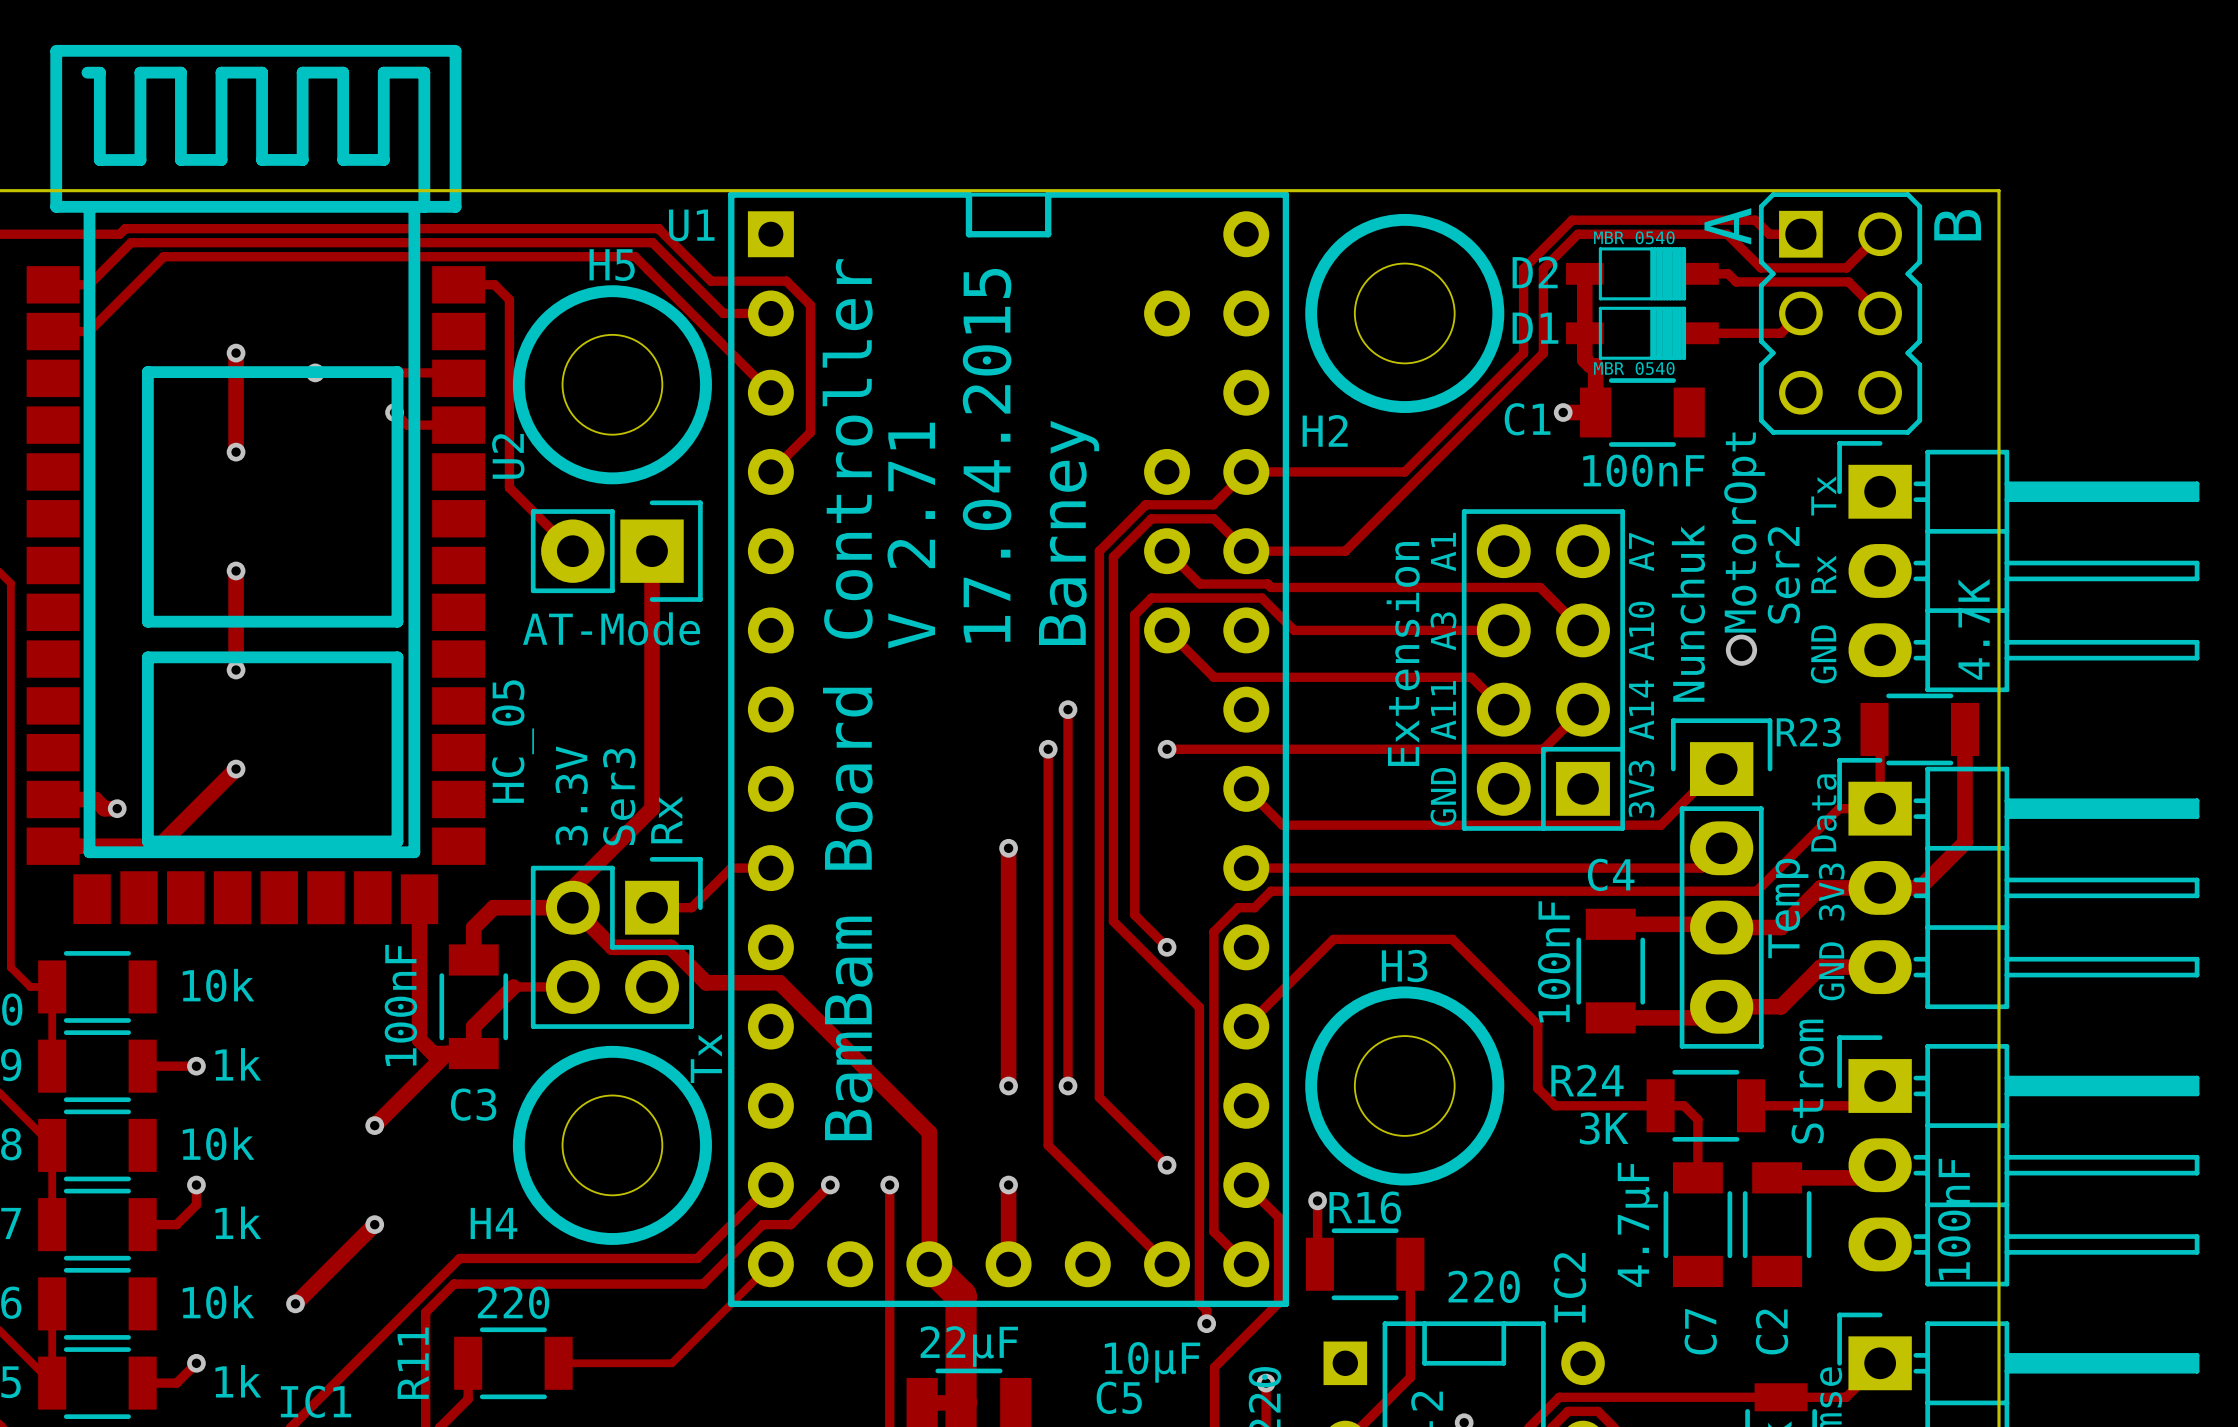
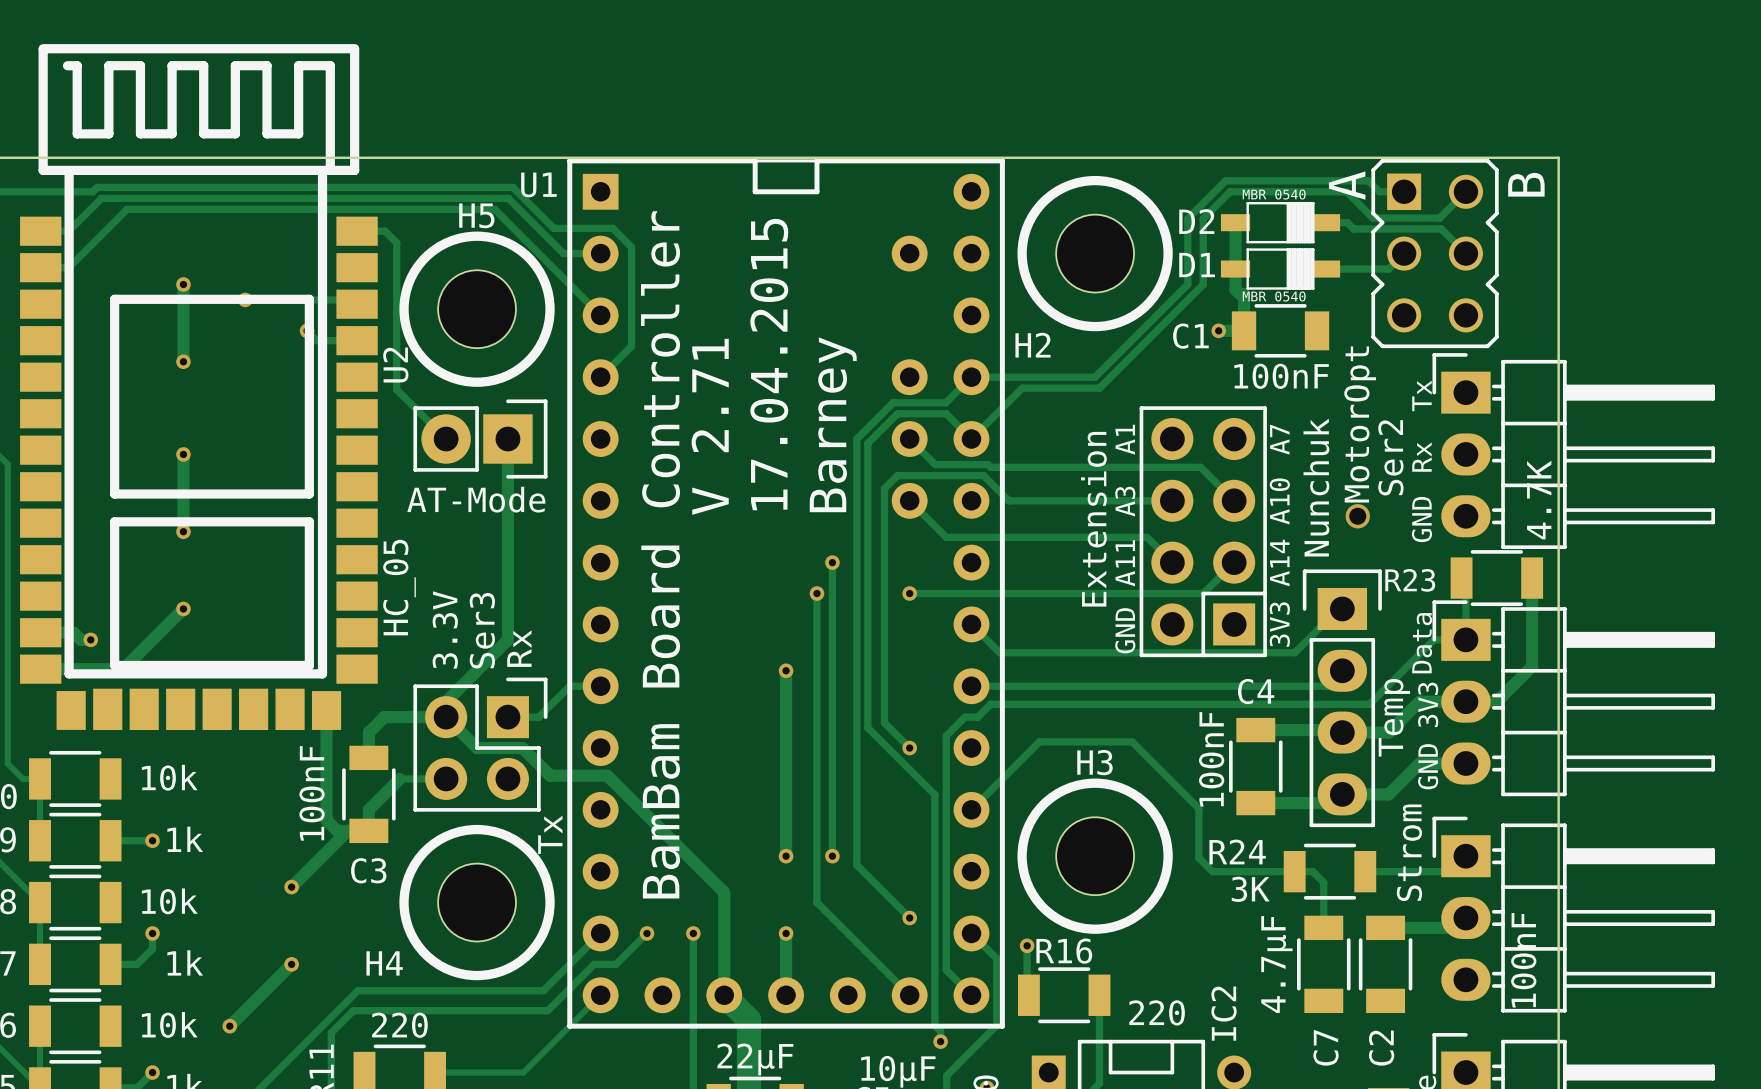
track: (1410, 485) (1345, 551) (1246, 551) -> (1099, 388) (1022, 388) (971, 439)

